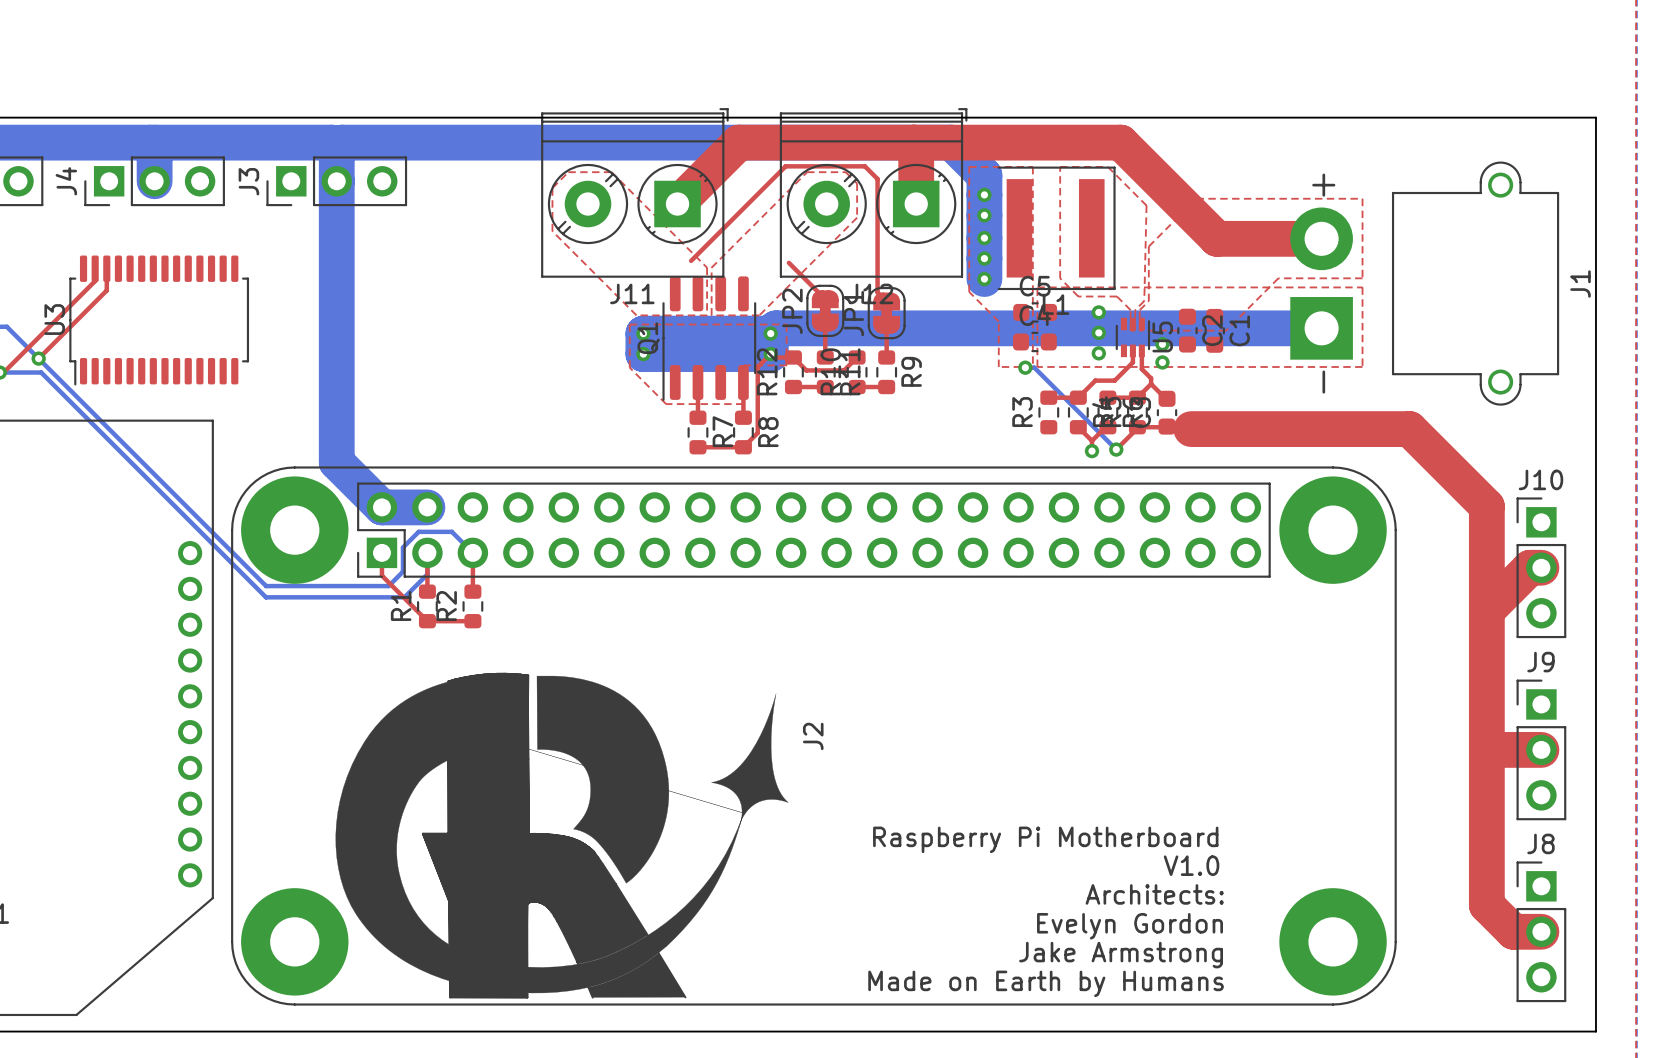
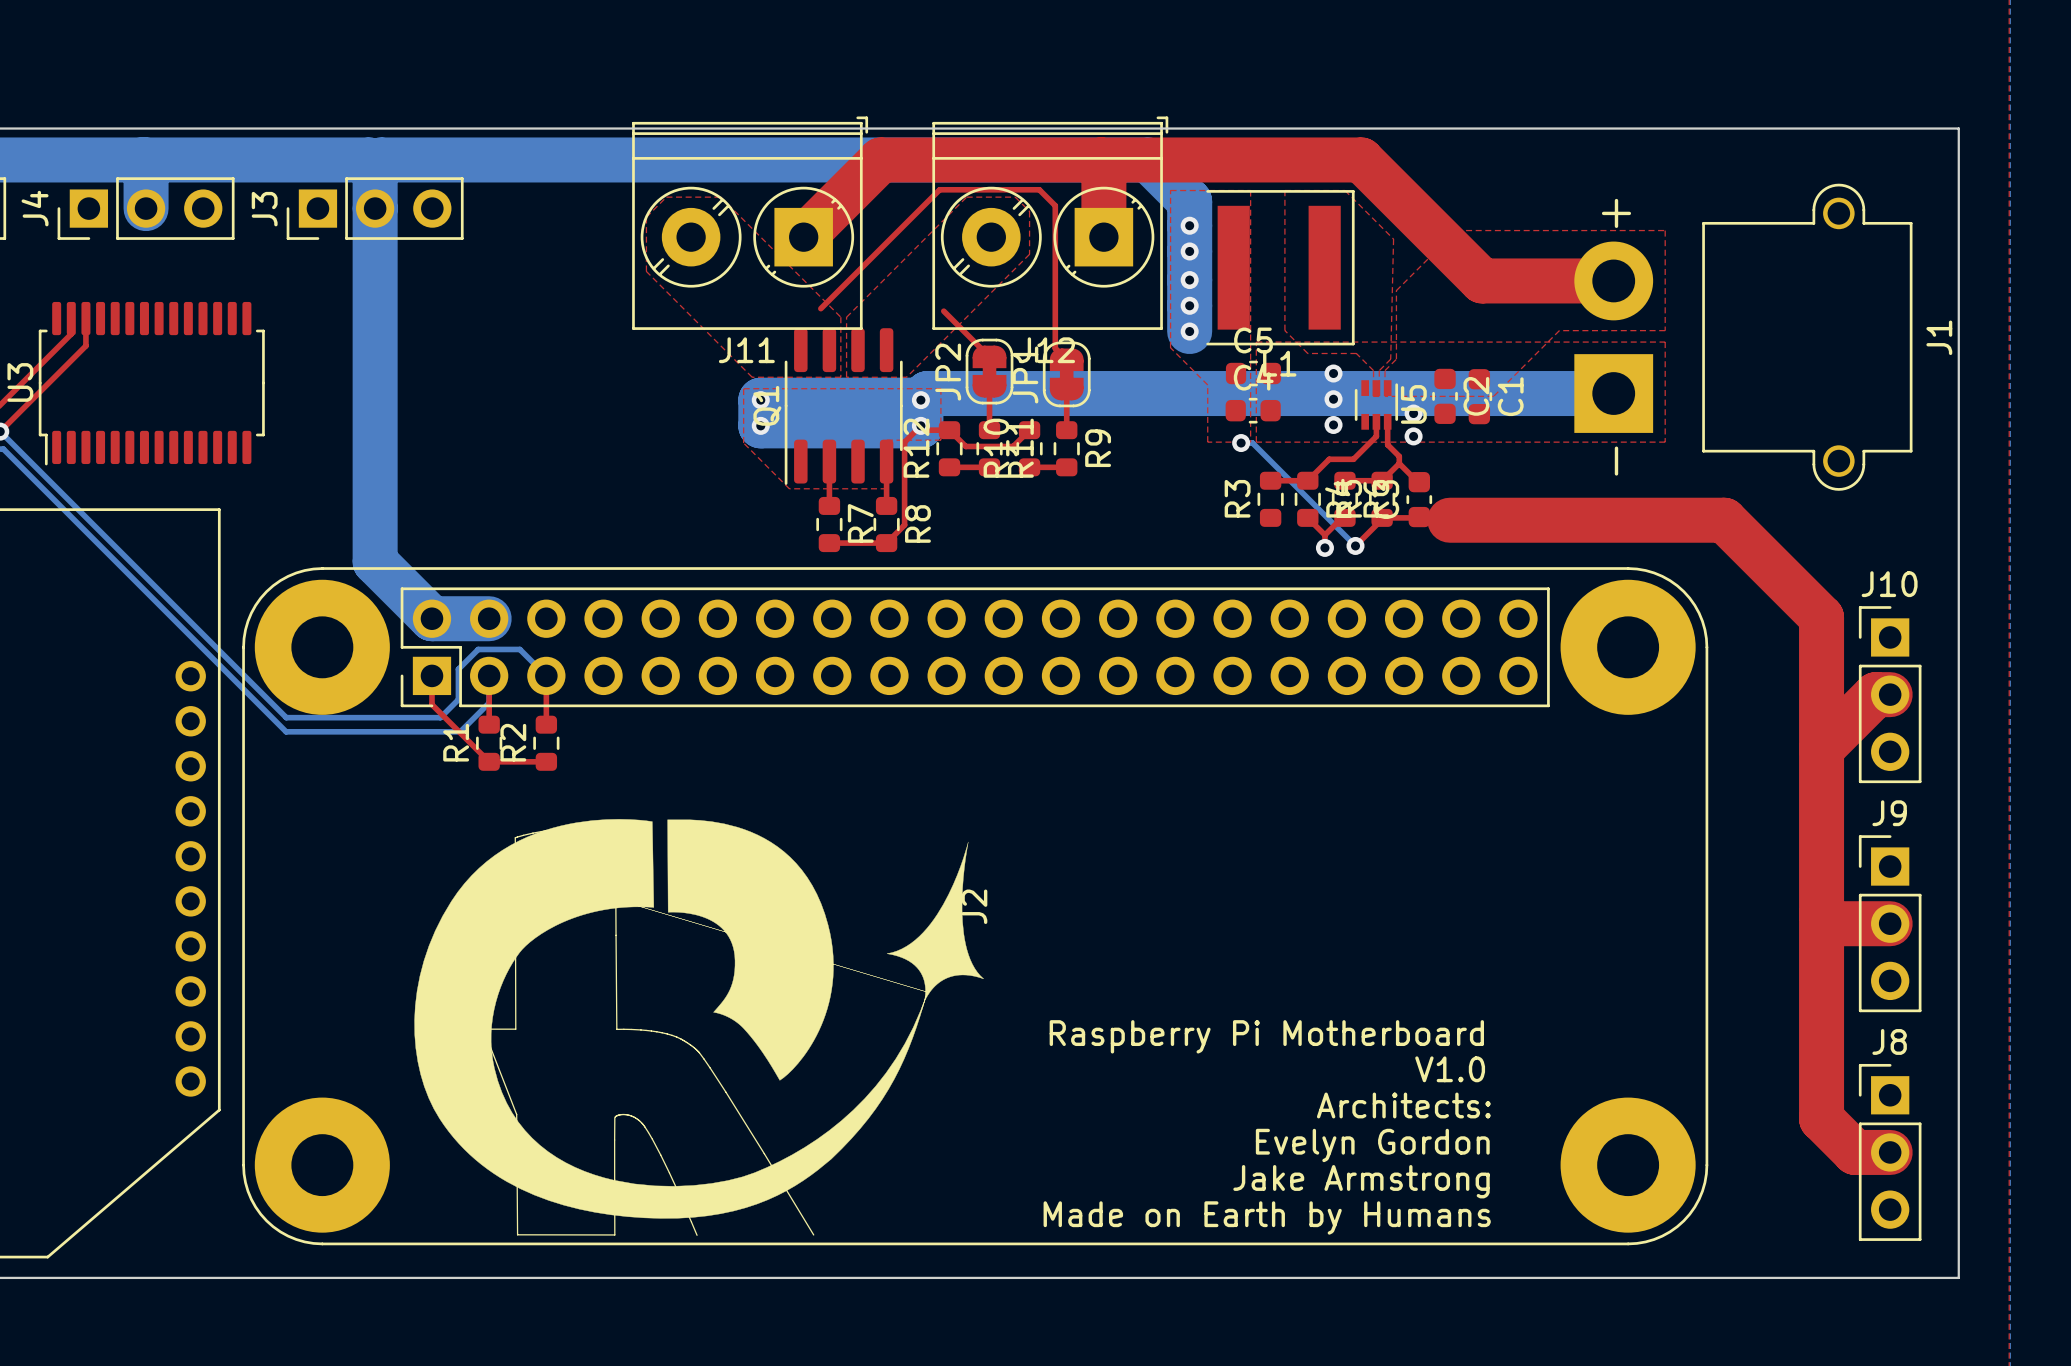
drawing: [422, 673, 686, 998] -> none
drawing position: (749, 760) -> (935, 926)
drawing position: (602, 779) -> (750, 950)
drawing position: (539, 834) -> (670, 1018)

